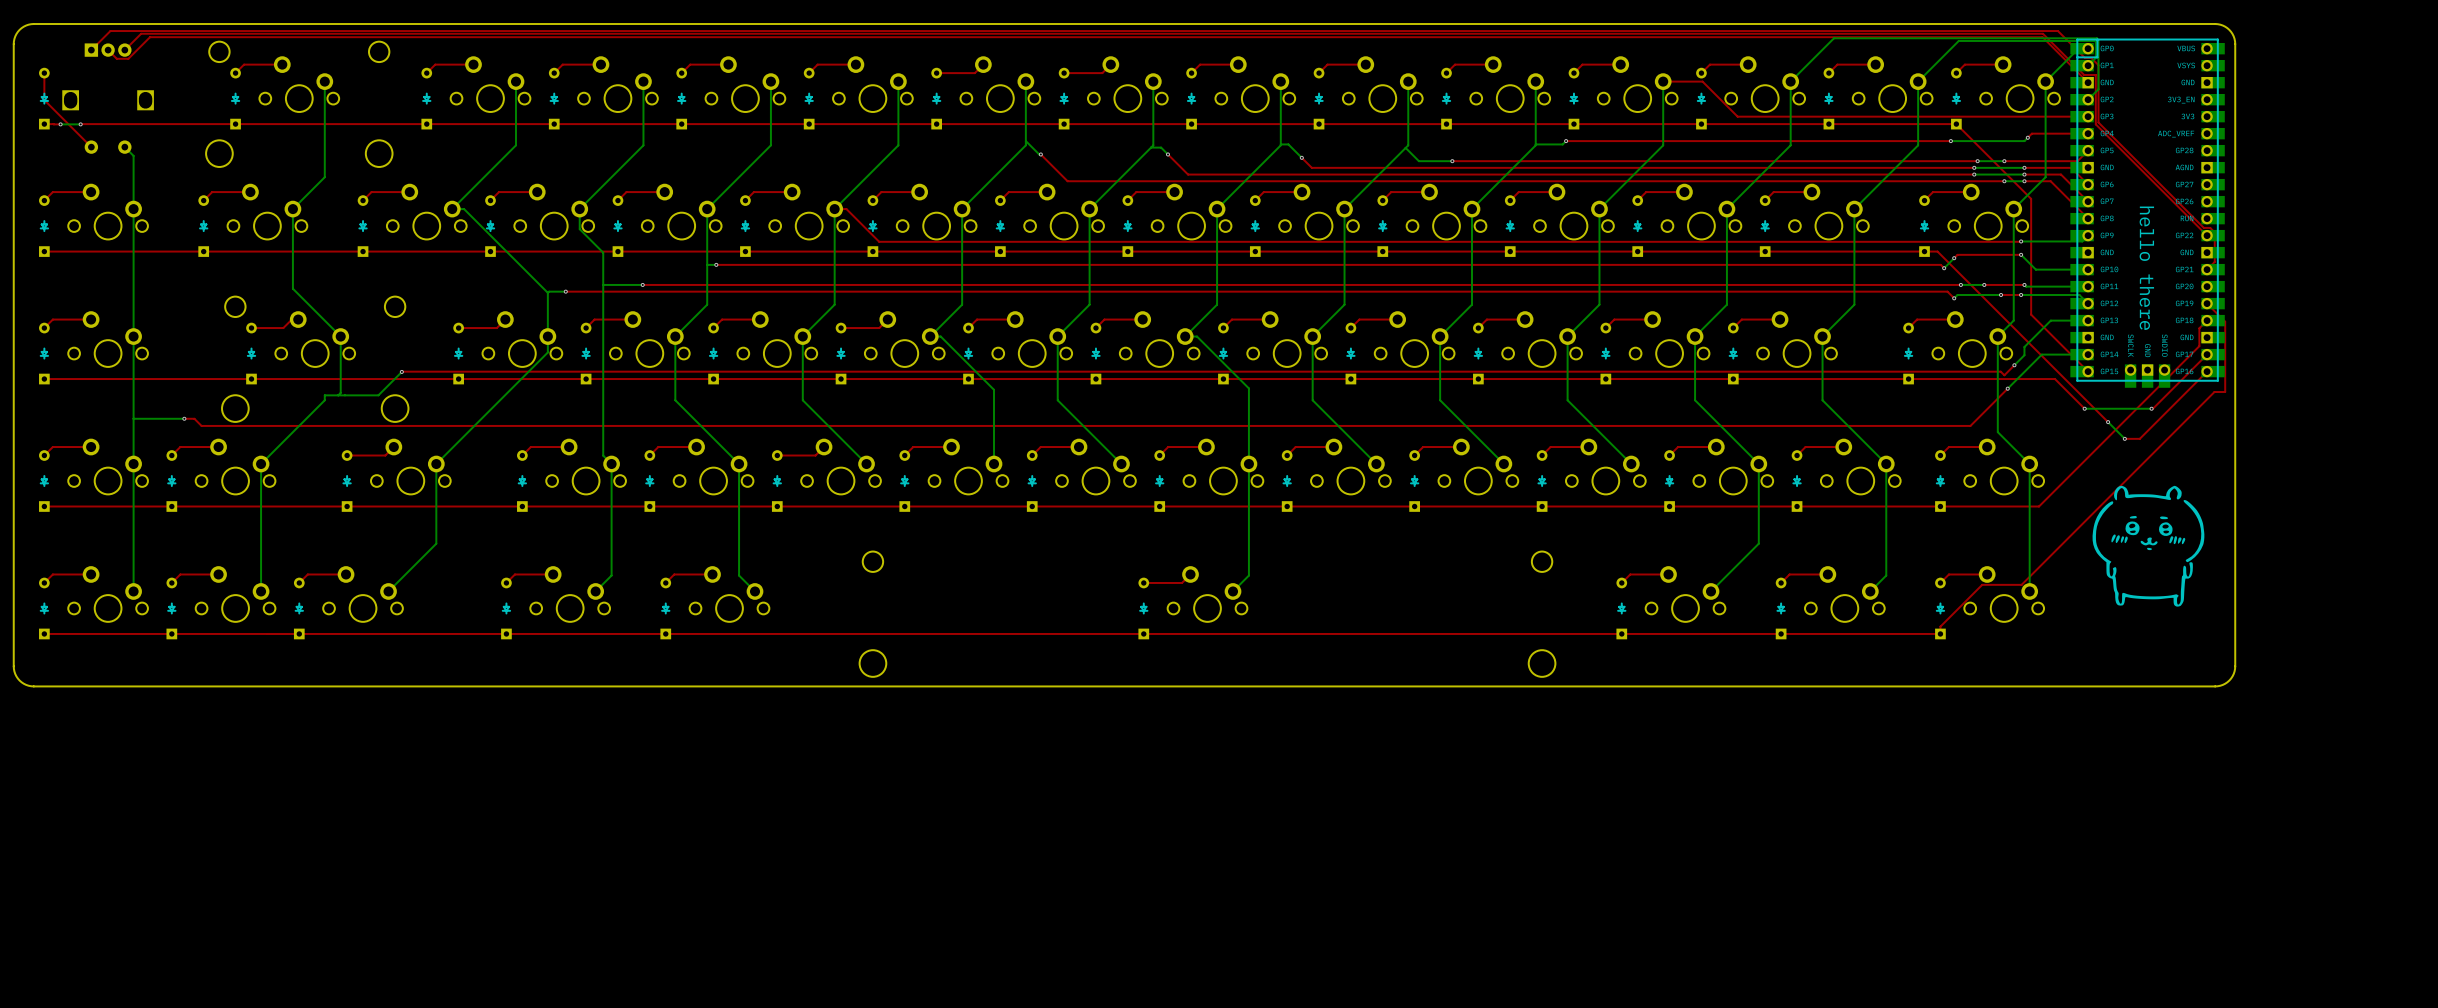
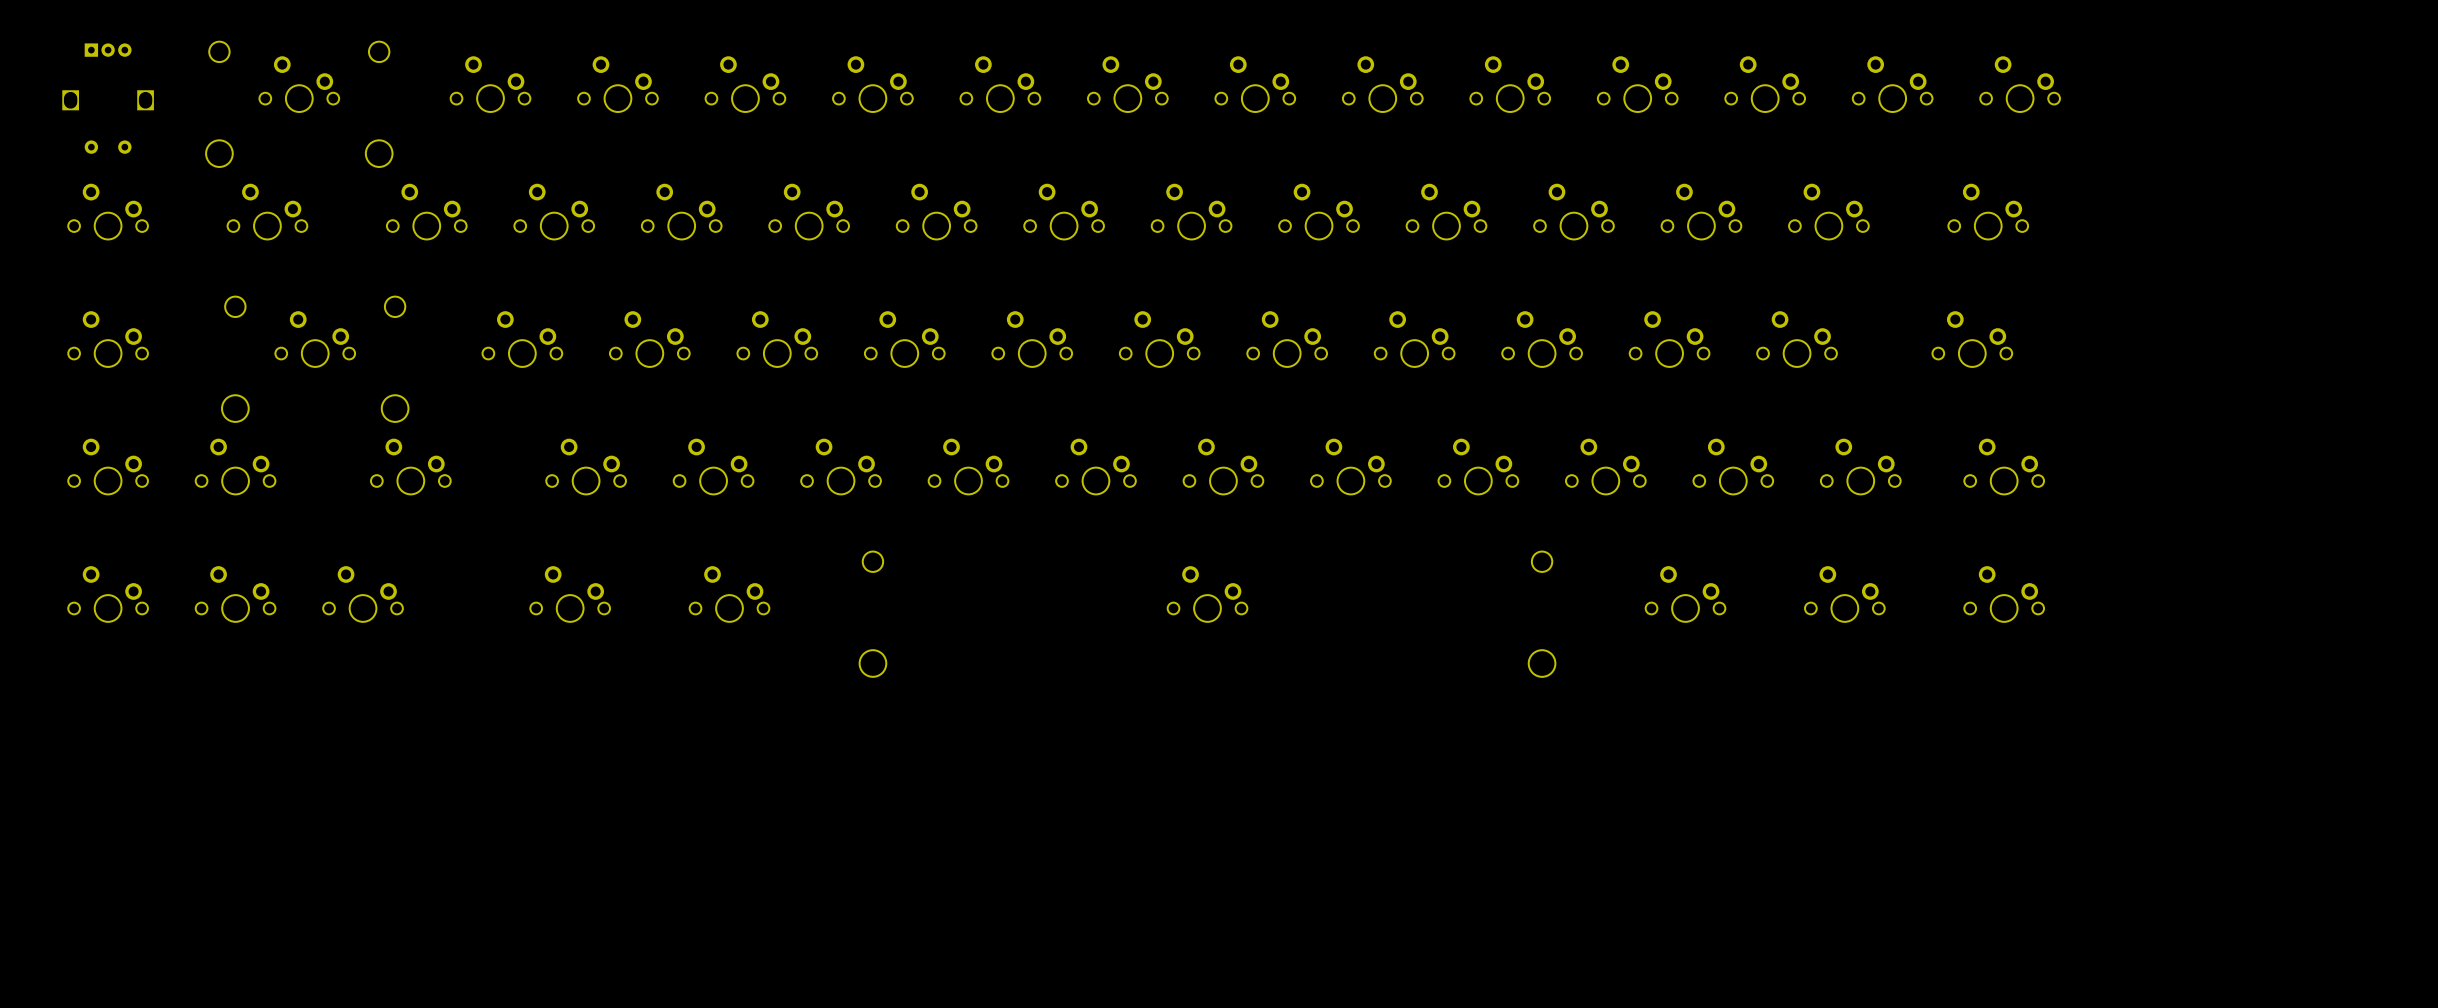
board edge: (2215, 24) (28, 24) (17, 31) (13, 44) (14, 671) (21, 682) (33, 686) (2220, 685) (2231, 678) (2235, 666) (2235, 44) (2233, 36) (2229, 29) (2222, 25) (2215, 24) -> none
bottom track: (2088, 48) (2078, 48) (2045, 81) (2045, 177) (2013, 209) (2013, 320) (1997, 336) (1997, 432) (2029, 464) (2029, 591) -> none
top track: (91, 50) (110, 31) (2057, 31) (2084, 57) (2091, 57) (2098, 65) (2098, 122) (2203, 227) (2210, 227) (2214, 232) (2214, 261) (2207, 269) -> none
top track: (108, 50) (116, 58) (128, 58) (150, 37) (2042, 37) (2088, 82) -> none
top track: (124, 50) (141, 33) (2042, 33) (2084, 74) (2095, 74) (2095, 124) (2207, 235) -> none
top track: (282, 64) (244, 64) (235, 73) -> none
top track: (473, 64) (435, 64) (426, 73) -> none
top track: (600, 64) (562, 64) (554, 73) -> none
top track: (728, 64) (690, 64) (681, 73) -> none
top track: (855, 64) (817, 64) (809, 73) -> none
top track: (983, 64) (974, 73) (936, 73) -> none
top track: (1110, 64) (1102, 73) (1064, 73) -> none
top track: (1238, 64) (1200, 64) (1191, 73) -> none
top track: (1365, 64) (1327, 64) (1319, 73) -> none
top track: (1493, 64) (1455, 64) (1446, 73) -> none
top track: (1620, 64) (1582, 64) (1573, 73) -> none
top track: (1748, 64) (1709, 64) (1701, 73) -> none
top track: (1875, 64) (1837, 64) (1828, 73) -> none
top track: (2003, 64) (1964, 64) (1956, 73) -> none
bottom track: (2088, 65) (2095, 57) (2095, 40) (1958, 40) (1918, 81) (1918, 145) (1854, 209) (1854, 304) (1822, 336) (1822, 400) (1886, 464) (1886, 575) (1870, 591) -> none
top track: (44, 73) (44, 100) (91, 147) -> none
bottom track: (324, 81) (324, 177) (292, 209) (292, 288) (340, 336) (340, 392) (338, 395) -> none
bottom track: (515, 81) (515, 145) (452, 209) (464, 209) (547, 292) -> none
bottom track: (643, 81) (643, 145) (579, 209) (579, 229) (603, 252) (603, 455) (611, 464) (611, 575) (595, 591) -> none
bottom track: (770, 81) (770, 145) (707, 209) (707, 304) (675, 336) (675, 400) (739, 464) (739, 575) (755, 591) -> none
bottom track: (898, 81) (898, 145) (834, 209) (834, 304) (802, 336) (802, 400) (866, 464) -> none
bottom track: (1025, 81) (1025, 145) (962, 209) (962, 304) (930, 336) (940, 336) (994, 389) (994, 464) -> none
bottom track: (1153, 81) (1153, 145) (1089, 209) (1089, 304) (1057, 336) (1057, 400) (1121, 464) -> none
bottom track: (1280, 81) (1280, 145) (1217, 209) (1217, 304) (1185, 336) (1197, 336) (1248, 388) (1248, 575) (1233, 591) -> none
bottom track: (1408, 81) (1408, 145) (1344, 209) (1344, 304) (1312, 336) (1312, 400) (1376, 464) -> none
bottom track: (1535, 81) (1535, 145) (1472, 209) (1472, 304) (1440, 336) (1440, 400) (1503, 464) -> none
top track: (1663, 81) (1702, 81) (1737, 116) (2088, 116) -> none
bottom track: (1663, 81) (1663, 145) (1599, 209) (1599, 304) (1567, 336) (1567, 400) (1631, 464) -> none
part: (44, 98) -> none
part: (235, 98) -> none
part: (426, 98) -> none
part: (554, 98) -> none
part: (681, 98) -> none
part: (809, 98) -> none
part: (936, 98) -> none
part: (1064, 98) -> none
part: (1191, 98) -> none
part: (1319, 98) -> none
part: (1446, 98) -> none
part: (1573, 98) -> none
part: (1701, 98) -> none
part: (1828, 98) -> none
part: (1956, 98) -> none
bottom track: (2088, 99) (2098, 89) (2098, 39) (2096, 38) (1833, 38) (1790, 81) (1790, 145) (1726, 209) (1726, 304) (1695, 336) (1695, 400) (1758, 464) (1758, 543) (1711, 591) -> none
top track: (44, 124) (60, 124) -> none
via: (60, 124) -> none
top track: (80, 124) (1956, 124) (2031, 198) (2031, 314) (2088, 371) -> none
bottom track: (80, 124) (60, 124) -> none
via: (80, 124) -> none
top track: (2088, 133) (2031, 133) (2027, 137) -> none
bottom track: (2027, 137) (2024, 141) (1950, 141) -> none
via: (2027, 137) -> none
bottom track: (1025, 141) (1040, 154) -> none
bottom track: (1566, 141) (1562, 144) (1535, 144) -> none
via: (1566, 141) -> none
top track: (1950, 141) (1566, 141) -> none
via: (1950, 141) -> none
bottom track: (1280, 144) (1288, 144) (1301, 157) -> none
bottom track: (124, 147) (133, 155) (133, 591) -> none
bottom track: (1151, 147) (1161, 147) (1167, 154) -> none
bottom track: (1405, 147) (1418, 161) (1452, 161) -> none
top track: (2088, 150) (2077, 161) (2004, 161) -> none
top track: (1040, 154) (1067, 181) (2004, 181) -> none
via: (1040, 154) -> none
top track: (1167, 154) (1188, 174) (1974, 174) -> none
via: (1167, 154) -> none
top track: (1301, 157) (1311, 167) (1974, 167) -> none
via: (1301, 157) -> none
via: (1452, 161) -> none
top track: (1977, 161) (1452, 161) -> none
via: (1977, 161) -> none
bottom track: (2004, 161) (1977, 161) -> none
via: (2004, 161) -> none
via: (1974, 167) -> none
top track: (2024, 167) (2071, 167) (2088, 184) -> none
bottom track: (2024, 167) (1974, 167) -> none
via: (2024, 167) -> none
via: (1974, 174) -> none
top track: (2024, 174) (2061, 174) (2088, 201) -> none
bottom track: (2024, 174) (1974, 174) -> none
via: (2024, 174) -> none
via: (2004, 181) -> none
top track: (2024, 181) (2050, 181) (2088, 218) -> none
bottom track: (2024, 181) (2004, 181) -> none
via: (2024, 181) -> none
top track: (91, 192) (52, 192) (44, 200) -> none
top track: (250, 192) (212, 192) (203, 200) -> none
top track: (409, 192) (371, 192) (363, 200) -> none
top track: (537, 192) (499, 192) (490, 200) -> none
top track: (664, 192) (626, 192) (617, 200) -> none
top track: (792, 192) (753, 192) (745, 200) -> none
top track: (919, 192) (881, 192) (872, 200) -> none
top track: (1047, 192) (1008, 192) (1000, 200) -> none
top track: (1174, 192) (1136, 192) (1127, 200) -> none
top track: (1302, 192) (1263, 192) (1255, 200) -> none
top track: (1429, 192) (1391, 192) (1382, 200) -> none
top track: (1556, 192) (1518, 192) (1510, 200) -> none
top track: (1684, 192) (1646, 192) (1637, 200) -> none
top track: (1811, 192) (1773, 192) (1765, 200) -> none
top track: (1971, 192) (1933, 192) (1924, 200) -> none
top track: (834, 209) (846, 209) (879, 241) (2021, 241) -> none
part: (2147, 213) -> none
part: (44, 226) -> none
part: (203, 226) -> none
part: (363, 226) -> none
part: (490, 226) -> none
part: (617, 226) -> none
part: (745, 226) -> none
part: (872, 226) -> none
part: (1000, 226) -> none
part: (1127, 226) -> none
part: (1255, 226) -> none
part: (1382, 226) -> none
part: (1510, 226) -> none
part: (1637, 226) -> none
part: (1765, 226) -> none
part: (1924, 226) -> none
bottom track: (2088, 235) (2082, 241) (2021, 241) -> none
via: (2021, 241) -> none
top track: (44, 251) (1937, 251) (2108, 422) -> none
top track: (2021, 254) (1957, 254) (1954, 258) -> none
bottom track: (2021, 254) (2035, 269) (2088, 269) -> none
via: (2021, 254) -> none
bottom track: (1954, 258) (1944, 268) -> none
via: (1954, 258) -> none
top track: (716, 264) (1940, 264) (1944, 268) -> none
bottom track: (716, 264) (707, 264) -> none
via: (716, 264) -> none
via: (1944, 268) -> none
text: hello there (2146, 268) -> none
bottom track: (642, 284) (603, 284) -> none
via: (642, 284) -> none
top track: (1960, 284) (642, 284) -> none
via: (1960, 284) -> none
bottom track: (1984, 284) (1960, 284) -> none
via: (1984, 284) -> none
top track: (2024, 284) (1984, 284) -> none
bottom track: (2024, 284) (2026, 286) (2088, 286) -> none
via: (2024, 284) -> none
top track: (565, 291) (1947, 291) (1954, 298) -> none
bottom track: (565, 291) (547, 292) -> none
via: (565, 291) -> none
bottom track: (547, 292) (547, 352) (436, 464) (436, 543) (388, 591) -> none
bottom track: (2001, 294) (1957, 294) (1954, 298) -> none
via: (2001, 294) -> none
top track: (2021, 294) (2001, 294) -> none
bottom track: (2021, 294) (2079, 294) (2088, 303) -> none
via: (2021, 294) -> none
via: (1954, 298) -> none
top track: (2207, 303) (2225, 321) (2225, 392) (2214, 392) (2021, 584) (1982, 584) (1940, 626) (1940, 633) (44, 633) -> none
top track: (91, 319) (52, 319) (44, 328) -> none
top track: (291, 319) (283, 328) (251, 328) -> none
top track: (505, 319) (496, 328) (458, 328) -> none
top track: (632, 319) (594, 319) (586, 328) -> none
top track: (760, 319) (722, 319) (713, 328) -> none
top track: (887, 319) (879, 328) (841, 328) -> none
top track: (1015, 319) (977, 319) (968, 328) -> none
top track: (1142, 319) (1104, 319) (1095, 328) -> none
top track: (1270, 319) (1231, 319) (1223, 328) -> none
top track: (1397, 319) (1359, 319) (1350, 328) -> none
top track: (1525, 319) (1486, 319) (1478, 328) -> none
top track: (1652, 319) (1614, 319) (1605, 328) -> none
top track: (1780, 319) (1741, 319) (1733, 328) -> none
top track: (1955, 319) (1917, 319) (1908, 328) -> none
bottom track: (2088, 320) (2050, 320) (2024, 346) (2024, 355) (2014, 365) -> none
top track: (2207, 320) (2199, 328) (2199, 346) (2039, 506) (44, 506) -> none
part: (44, 353) -> none
part: (251, 353) -> none
part: (458, 353) -> none
part: (586, 353) -> none
part: (713, 353) -> none
part: (841, 353) -> none
part: (968, 353) -> none
part: (1095, 353) -> none
part: (1223, 353) -> none
part: (1350, 353) -> none
part: (1478, 353) -> none
part: (1605, 353) -> none
part: (1733, 353) -> none
part: (1908, 353) -> none
bottom track: (2088, 354) (2041, 354) (2007, 388) -> none
top track: (2207, 354) (2151, 408) -> none
top track: (2014, 365) (2004, 375) (2000, 371) (401, 371) -> none
via: (2014, 365) -> none
bottom track: (401, 371) (378, 395) (324, 395) (324, 400) (261, 464) (261, 591) -> none
via: (401, 371) -> none
top track: (2207, 371) (2139, 438) (2124, 438) -> none
top track: (44, 379) (2054, 379) (2084, 408) -> none
top track: (2007, 388) (1970, 425) (201, 425) (194, 418) (184, 418) -> none
via: (2007, 388) -> none
via: (2084, 408) -> none
bottom track: (2151, 408) (2084, 408) -> none
via: (2151, 408) -> none
bottom track: (184, 418) (133, 418) -> none
via: (184, 418) -> none
bottom track: (2108, 422) (2124, 438) -> none
via: (2108, 422) -> none
via: (2124, 438) -> none
top track: (91, 447) (52, 447) (44, 455) -> none
top track: (218, 447) (180, 447) (171, 455) -> none
top track: (393, 447) (385, 455) (347, 455) -> none
top track: (569, 447) (530, 447) (522, 455) -> none
top track: (696, 447) (658, 447) (649, 455) -> none
top track: (824, 447) (815, 455) (777, 455) -> none
top track: (951, 447) (913, 447) (904, 455) -> none
top track: (1078, 447) (1040, 447) (1032, 455) -> none
top track: (1206, 447) (1168, 447) (1159, 455) -> none
top track: (1333, 447) (1295, 447) (1287, 455) -> none
top track: (1461, 447) (1423, 447) (1414, 455) -> none
top track: (1588, 447) (1550, 447) (1542, 455) -> none
top track: (1716, 447) (1678, 447) (1669, 455) -> none
top track: (1843, 447) (1805, 447) (1797, 455) -> none
top track: (1987, 447) (1948, 447) (1940, 455) -> none
part: (44, 481) -> none
part: (171, 481) -> none
part: (347, 481) -> none
part: (522, 481) -> none
part: (649, 481) -> none
part: (777, 481) -> none
part: (904, 481) -> none
part: (1032, 481) -> none
part: (1159, 481) -> none
part: (1287, 481) -> none
part: (1414, 481) -> none
part: (1542, 481) -> none
part: (1669, 481) -> none
part: (1797, 481) -> none
part: (1940, 481) -> none
drawing: [2092, 485, 2205, 607] -> none
top track: (91, 574) (52, 574) (44, 582) -> none
top track: (218, 574) (180, 574) (171, 582) -> none
top track: (346, 574) (307, 574) (299, 582) -> none
top track: (553, 574) (514, 574) (506, 582) -> none
top track: (712, 574) (674, 574) (665, 582) -> none
top track: (1190, 574) (1182, 582) (1143, 582) -> none
top track: (1668, 574) (1630, 574) (1621, 582) -> none
top track: (1827, 574) (1789, 574) (1781, 582) -> none
top track: (1987, 574) (1948, 574) (1940, 582) -> none
part: (44, 608) -> none
part: (171, 608) -> none
part: (299, 608) -> none
part: (506, 608) -> none
part: (665, 608) -> none
part: (1143, 608) -> none
part: (1621, 608) -> none
part: (1781, 608) -> none
part: (1940, 608) -> none

